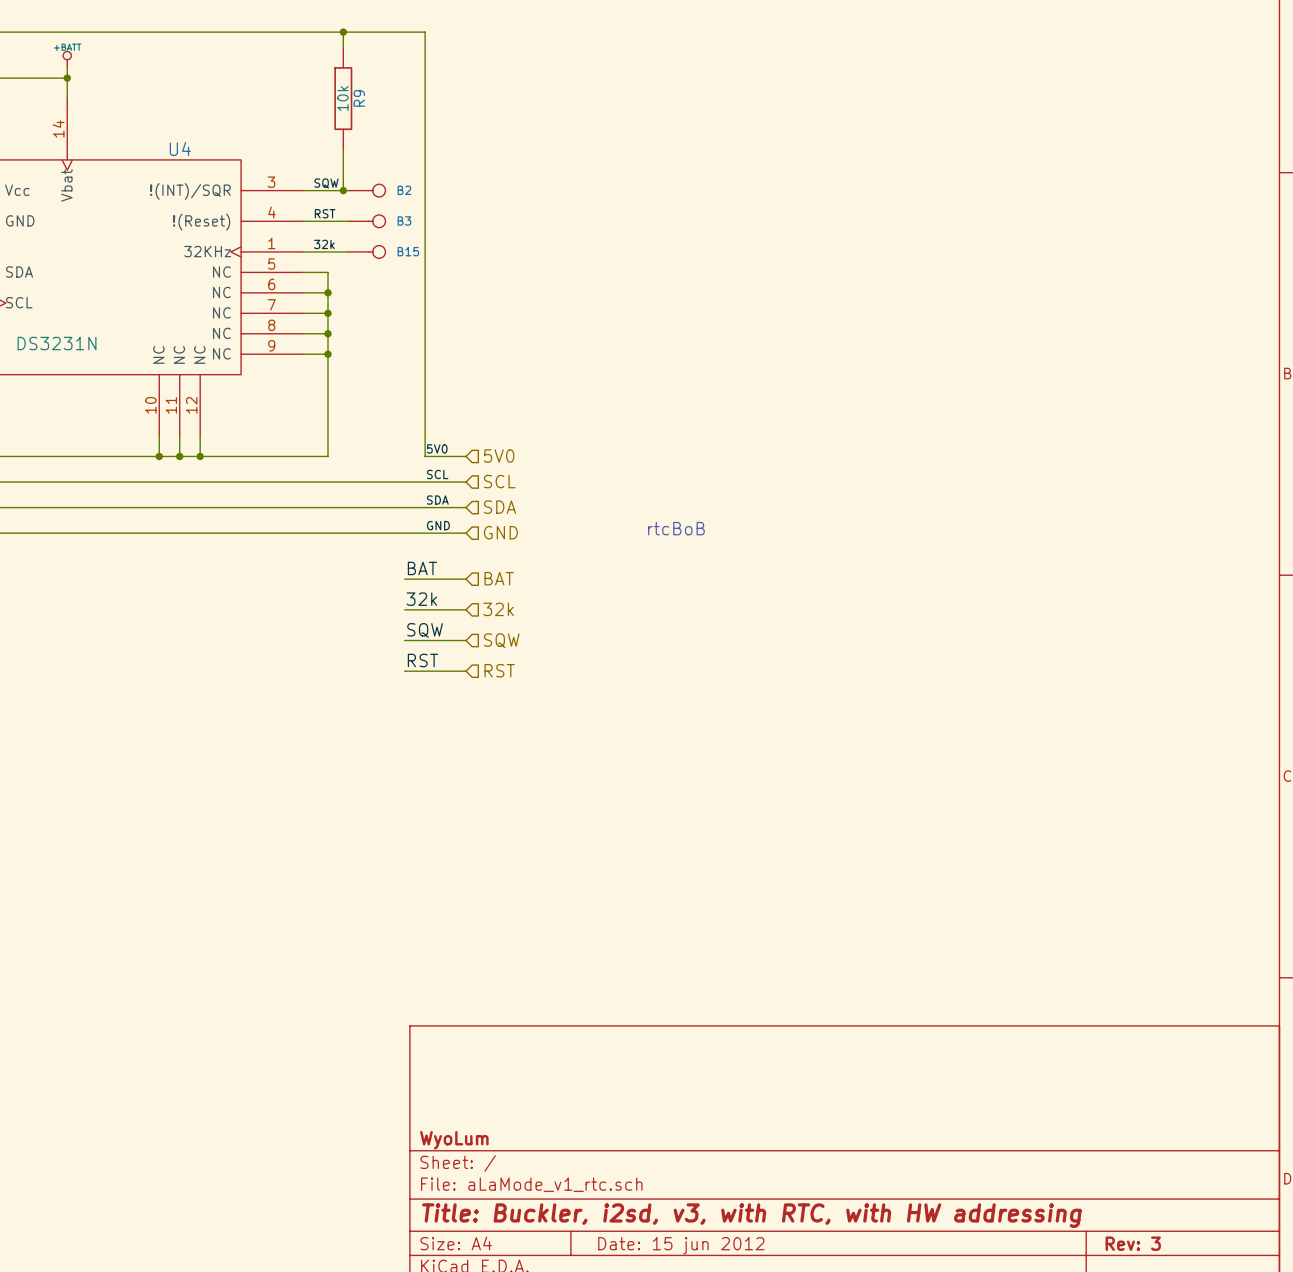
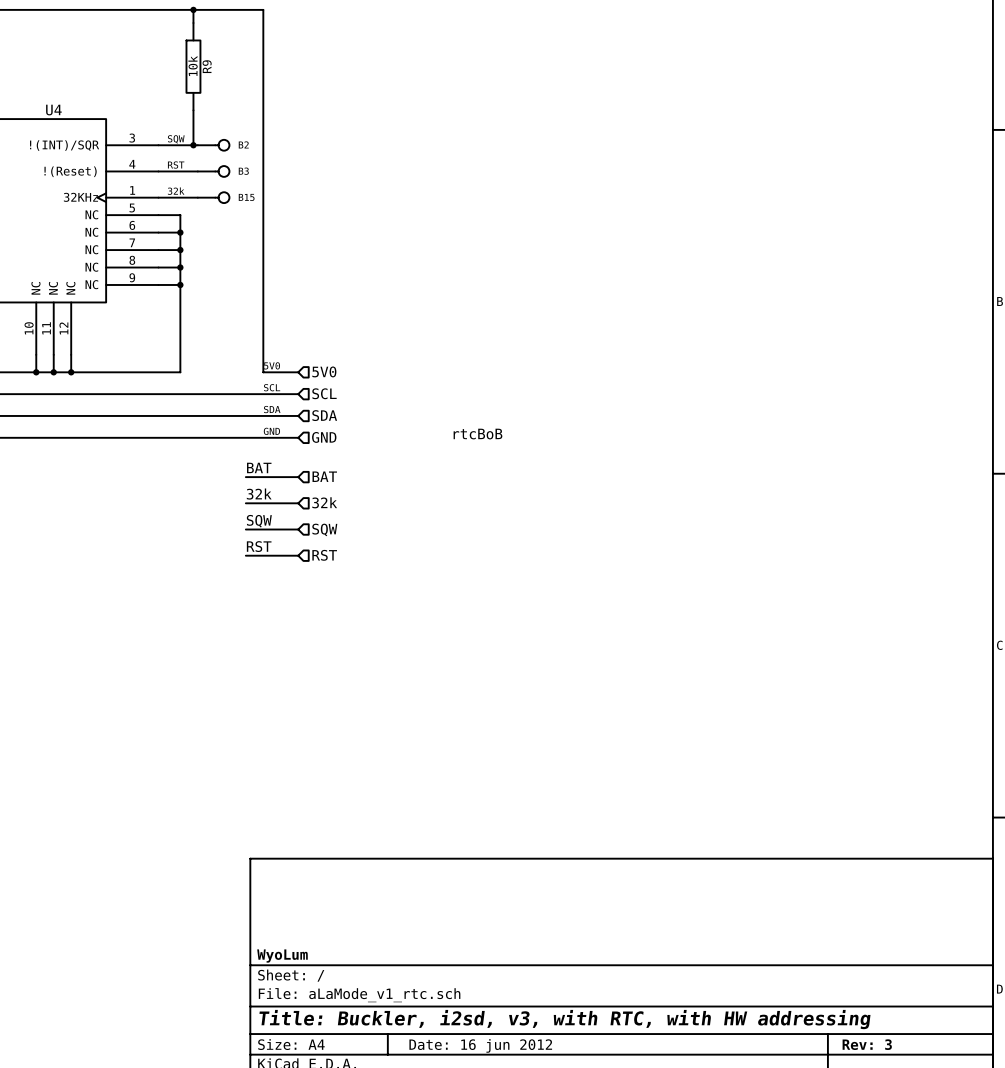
title block: Date: 15 jun 2012 (681, 1245) -> Date: 16 jun 2012 (480, 1045)

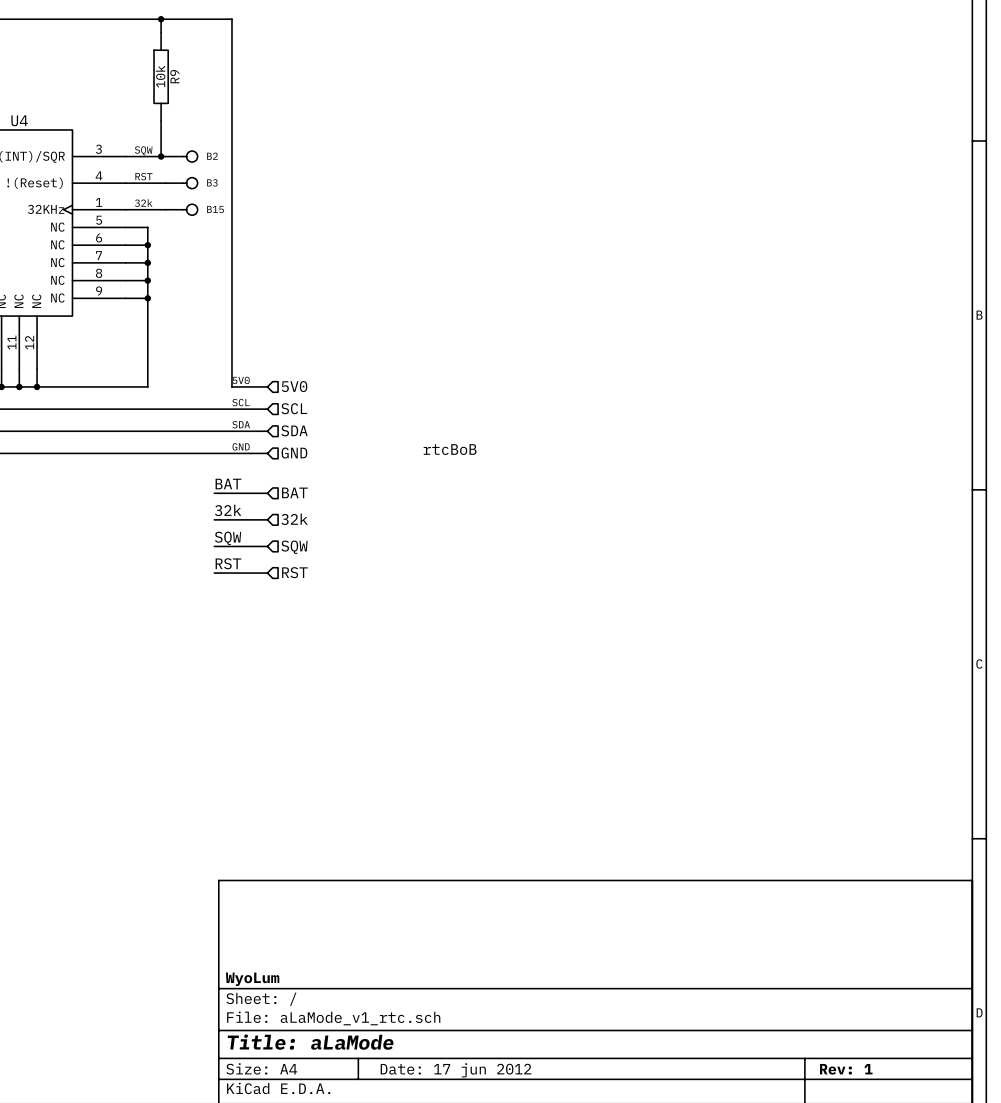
title block: Title: Buckler, i2sd, v3, with RTC, with HW addressing (564, 1019) -> Title: aLaMode (310, 1042)
title block: Rev: 3 (867, 1044) -> Rev: 1 (846, 1069)
title block: Date: 16 jun 2012 (480, 1045) -> Date: 17 jun 2012 (455, 1070)

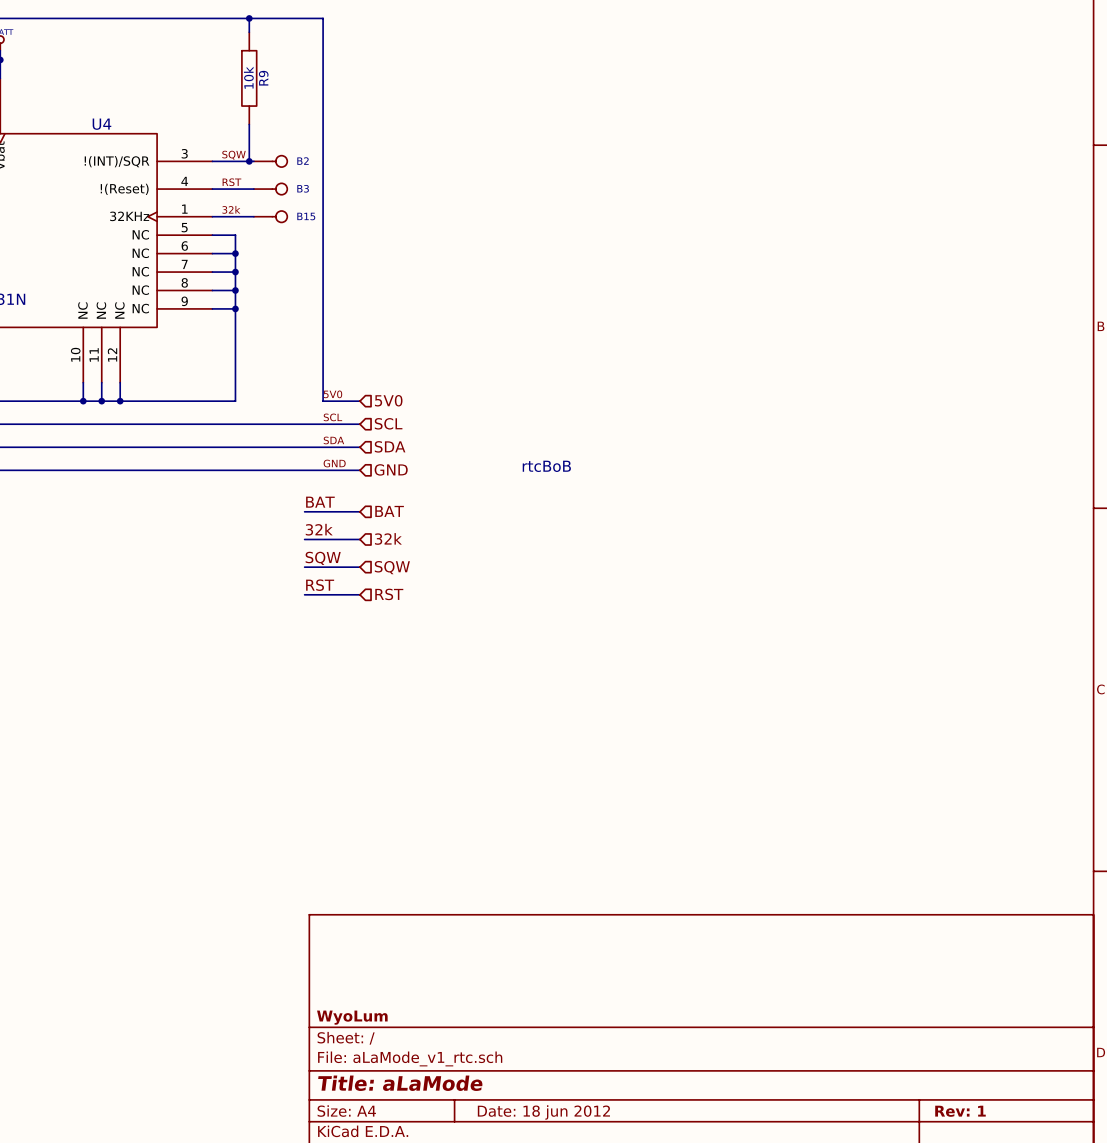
title block: Date: 17 jun 2012 (455, 1070) -> Date: 18 jun 2012 (543, 1112)

